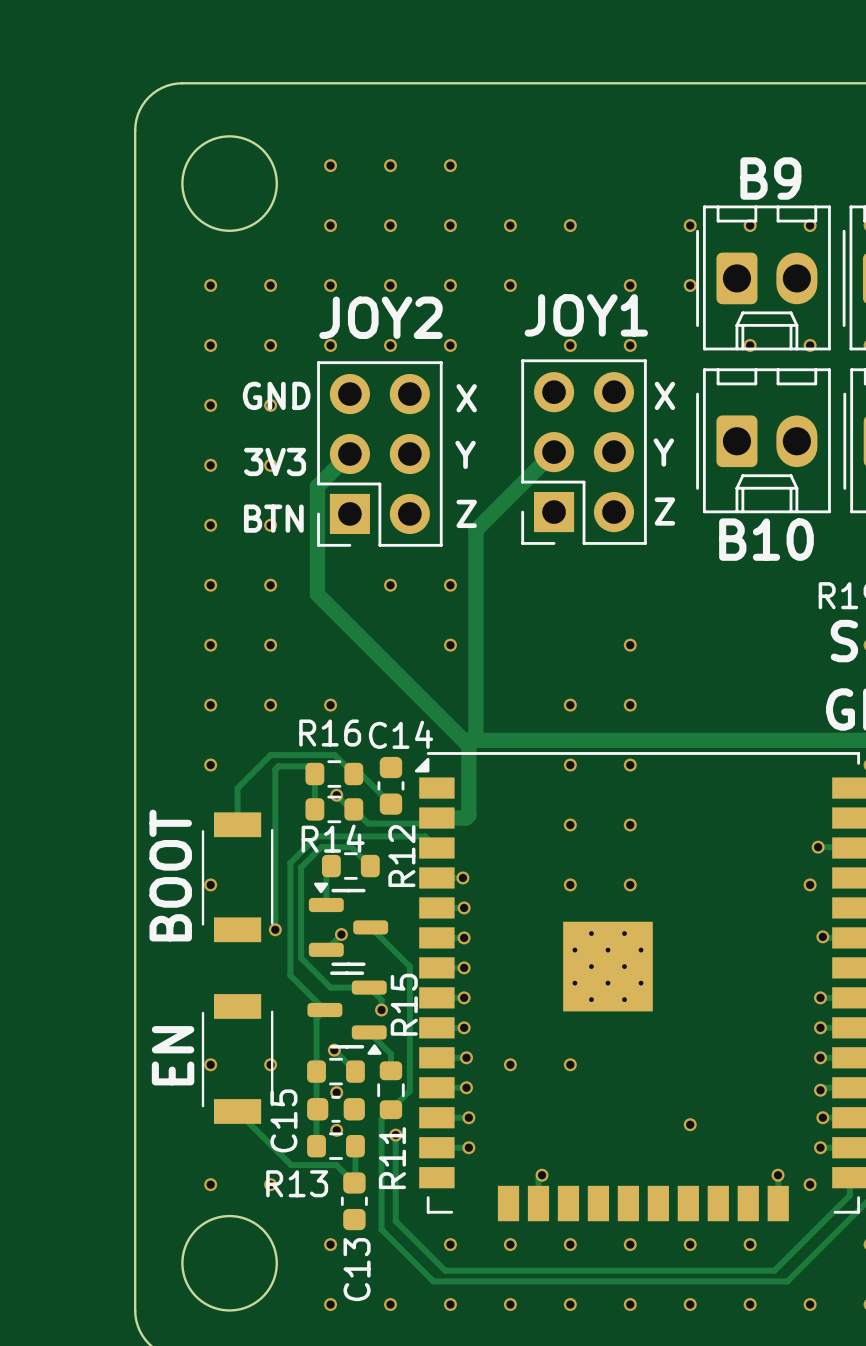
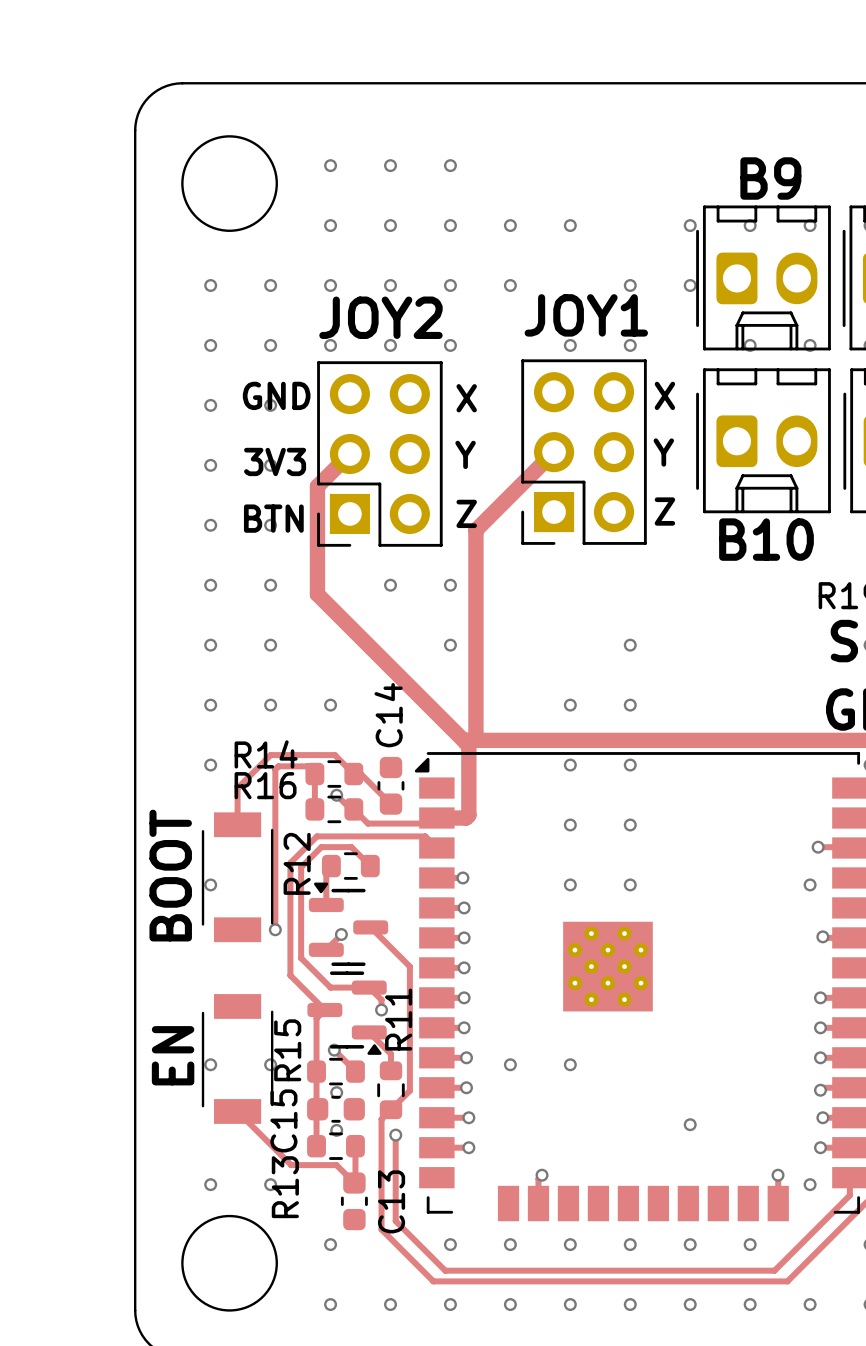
R16 name position: R16 (330, 733) -> R16 (265, 785)
C14 name rotation: 0° (400, 734) -> 90° counterclockwise (388, 715)
R14 name position: R14 (333, 838) -> R14 (266, 754)
R12 name position: R12 (401, 856) -> R12 (297, 863)
R15 name position: R15 (404, 1004) -> R15 (287, 1050)
R11 name position: R11 (392, 1158) -> R11 (398, 1019)
R13 name rotation: 0° (297, 1183) -> 90° counterclockwise (285, 1187)
C13 name position: C13 (357, 1269) -> C13 (391, 1201)

